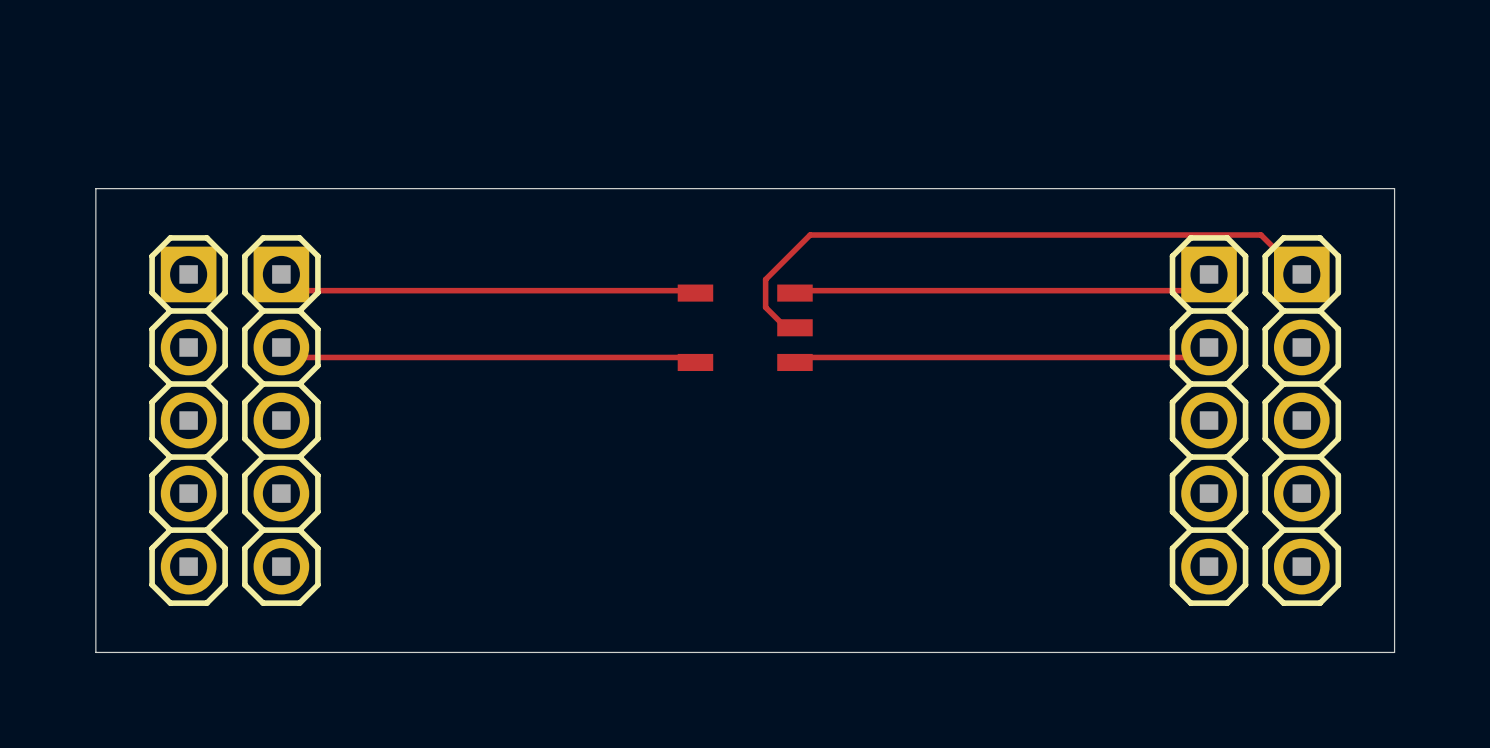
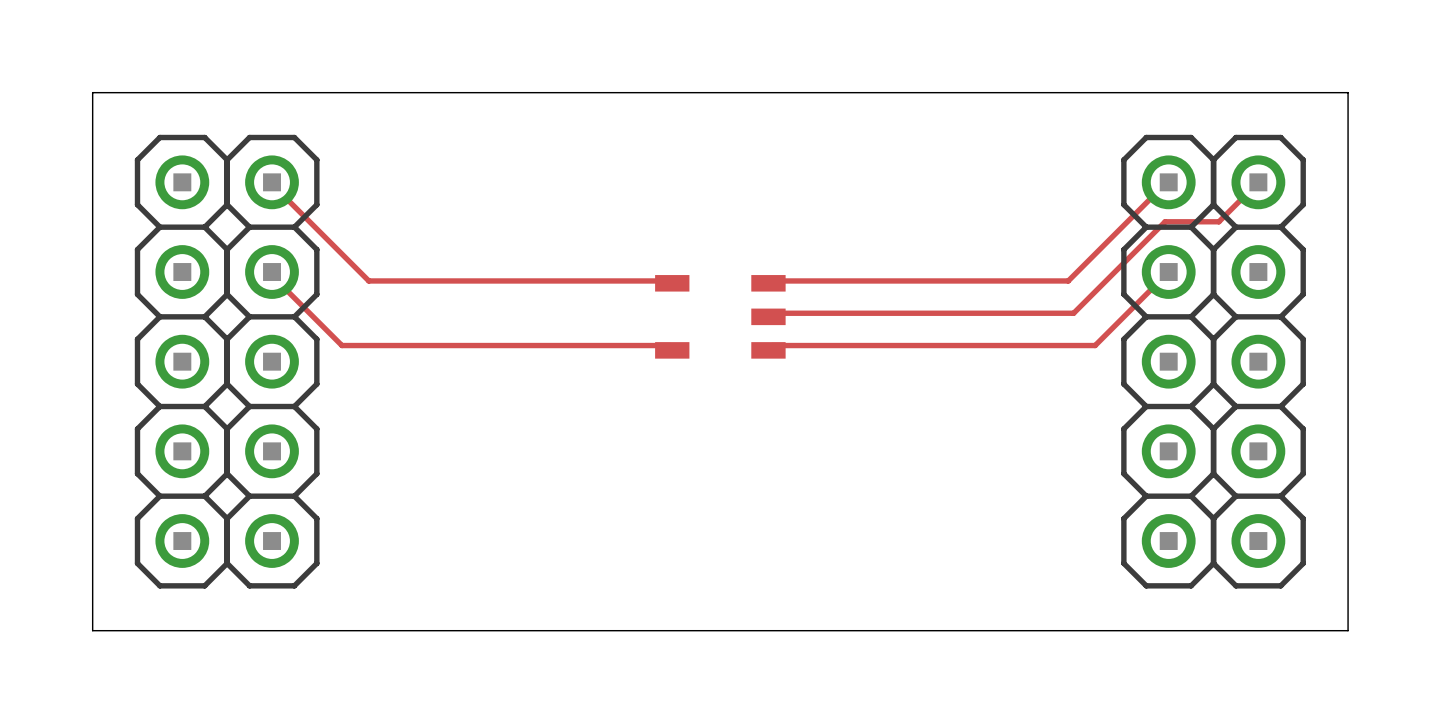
board edge: (1394, 188) (95, 188) -> (1348, 182) (1348, 92) (92, 92) (92, 182)
top track: (281, 274) (281, 279) (292, 290) (381, 290) -> (272, 182) (368, 280)
top track: (1209, 274) (1194, 290) (1105, 290) -> (1168, 182) (1068, 280)
top track: (1301, 274) (1260, 235) (810, 235) (765, 279) (765, 307) (782, 324) (793, 324) (794, 327) -> (1258, 182) (1218, 221) (1165, 221) (1073, 313) (772, 313) (768, 316)
top track: (281, 347) (281, 351) (286, 357) (353, 357) -> (272, 272) (272, 275) (341, 345)
top track: (1209, 347) (1199, 357) (1132, 357) -> (1168, 272) (1095, 345)
part: none -> (182, 361)
part: none -> (272, 361)
part: none -> (1168, 361)
part: none -> (1258, 361)
part: (188, 420) -> none
part: (281, 420) -> none
part: (1209, 420) -> none
part: (1301, 420) -> none

